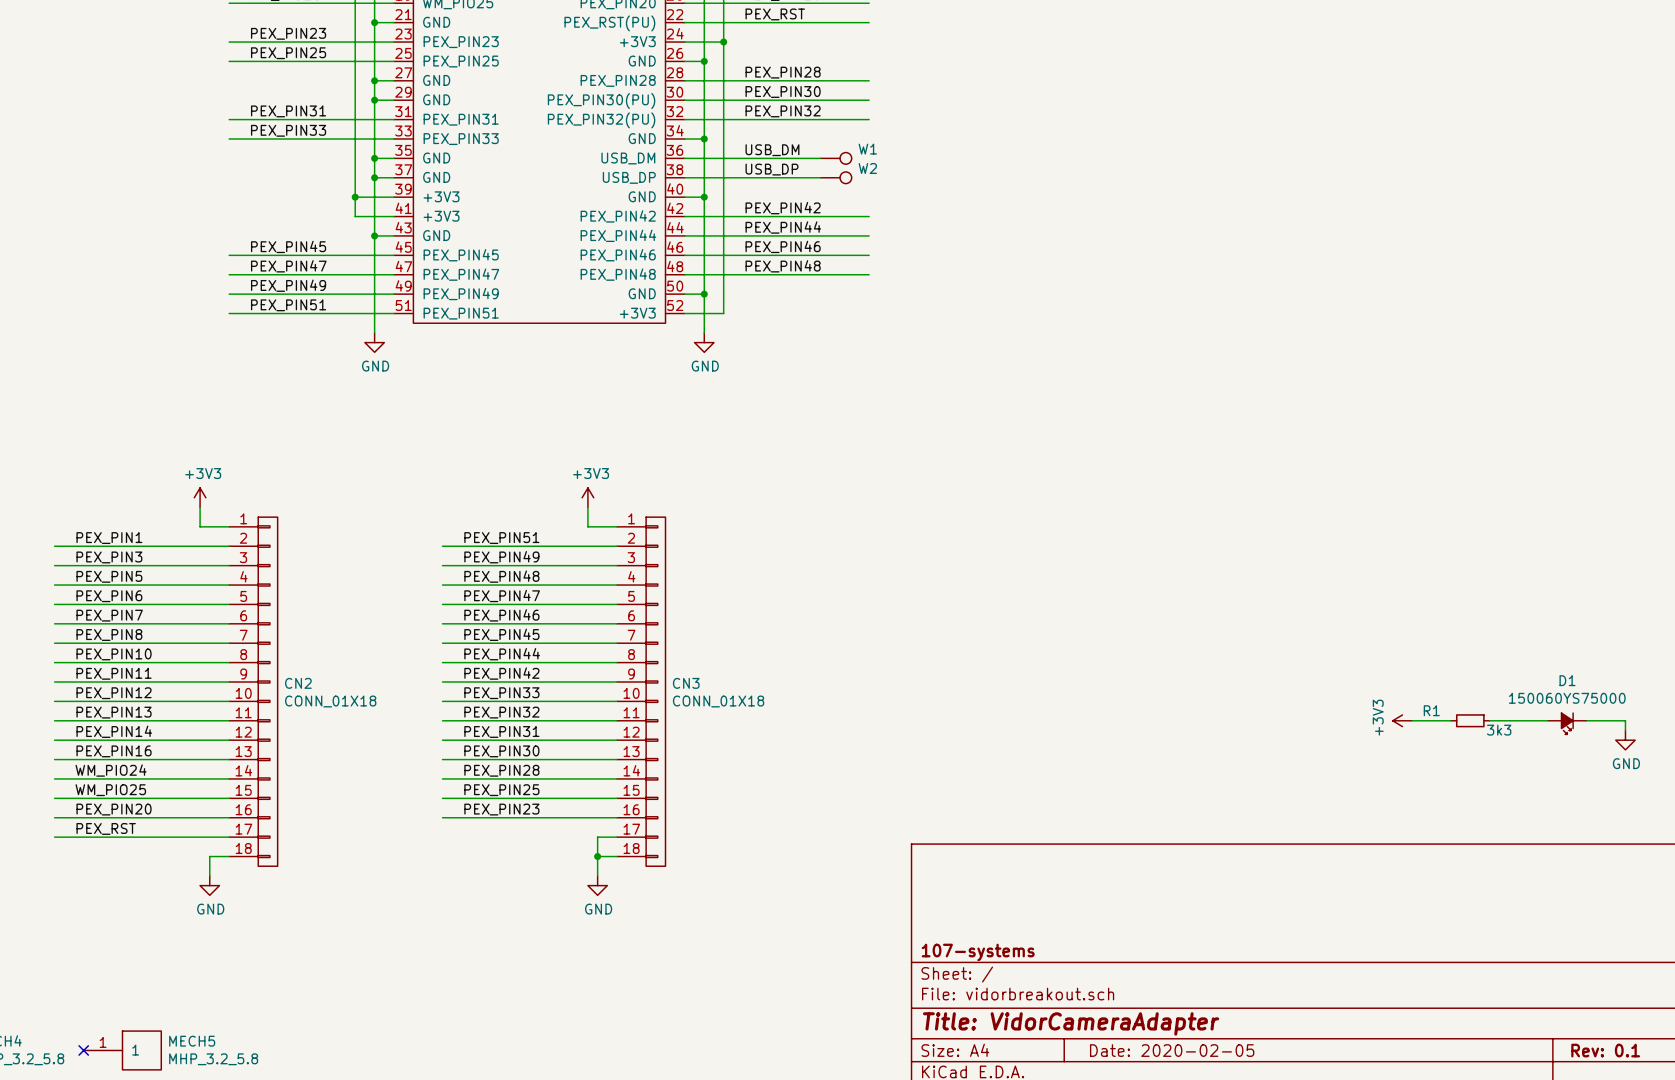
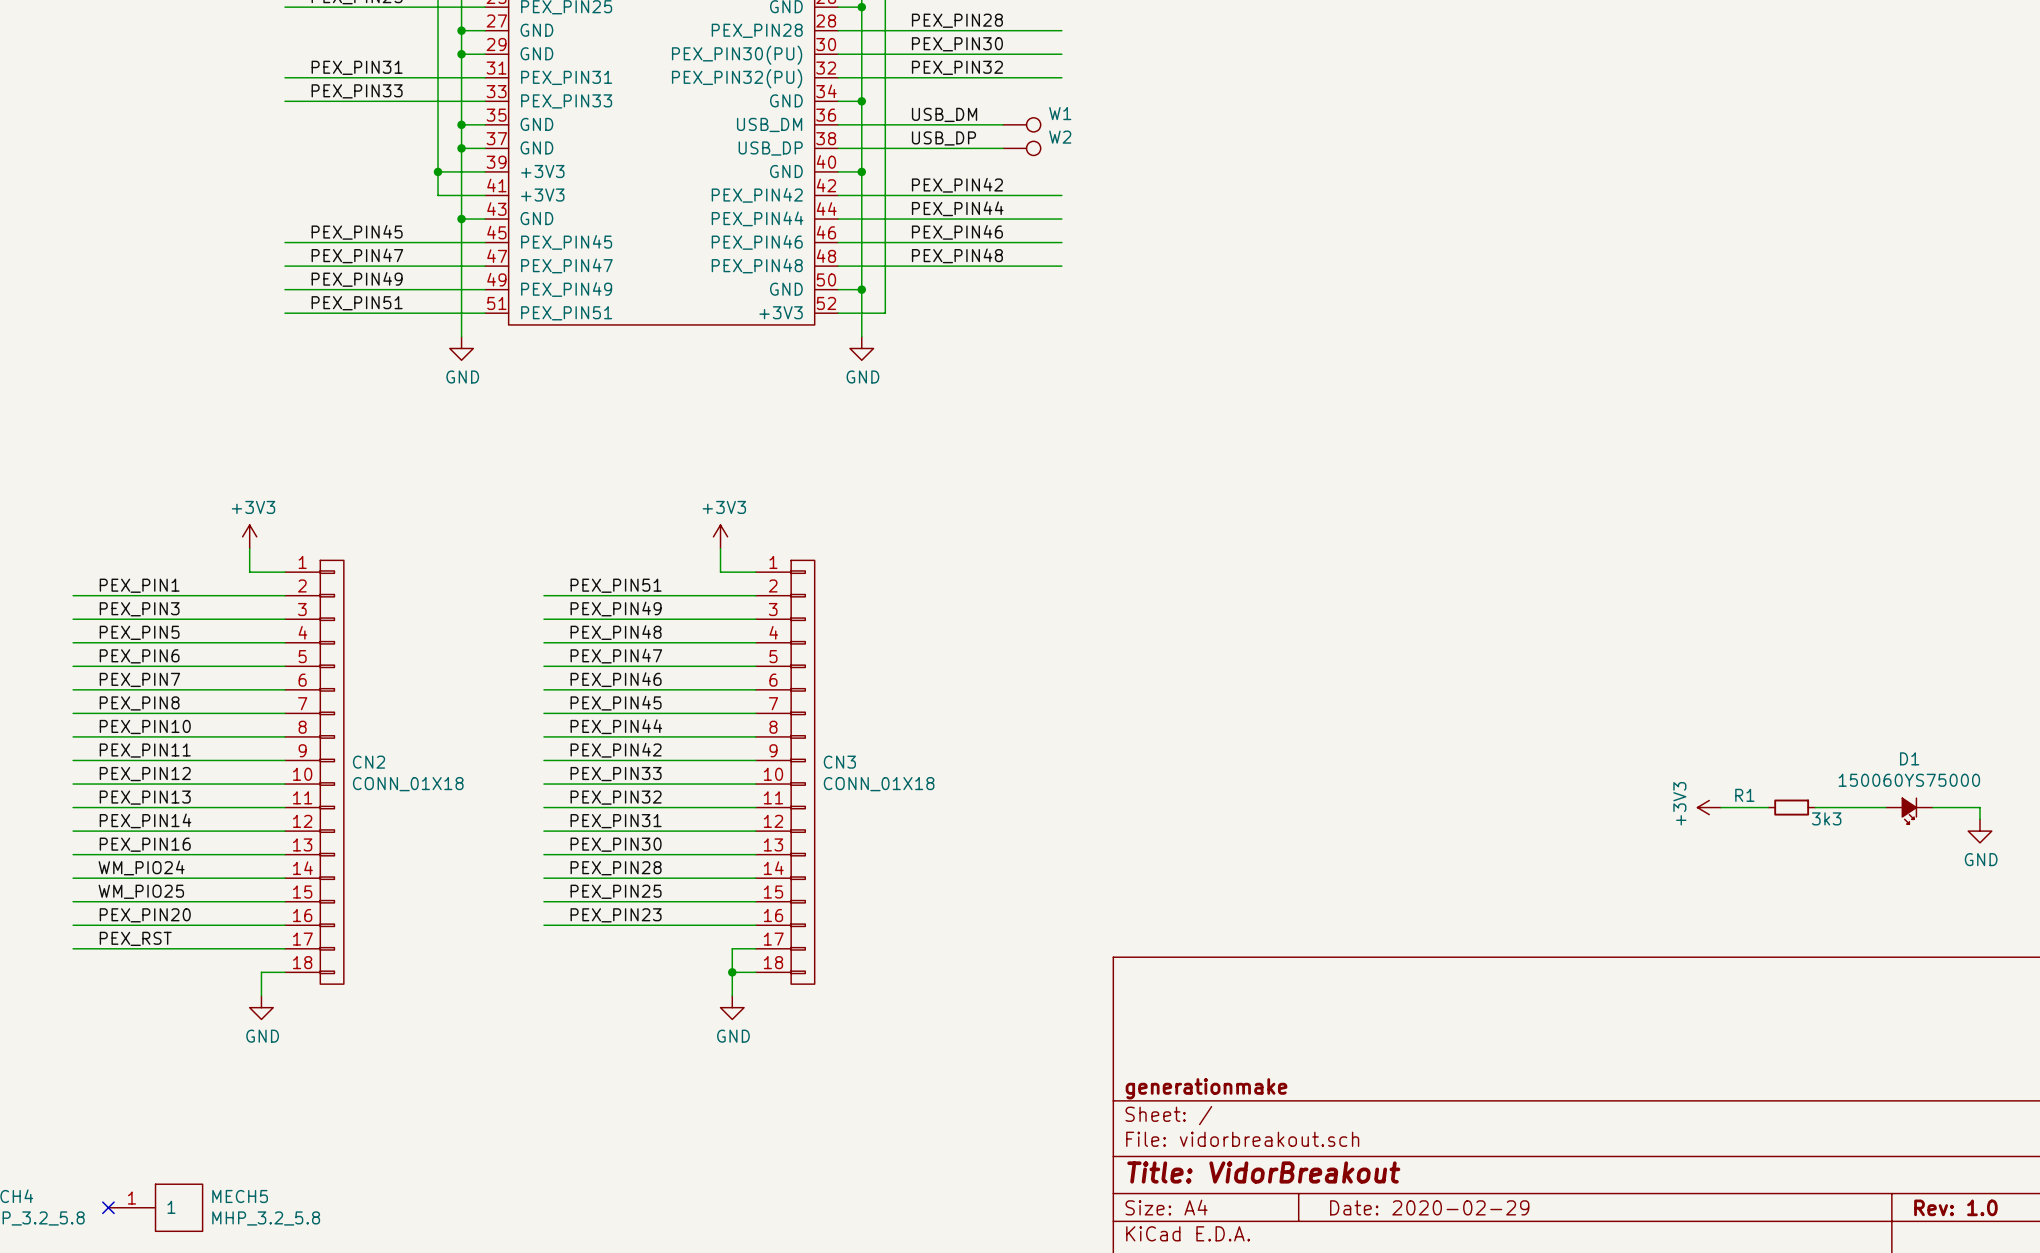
title block: 107-systems (978, 952) -> generationmake (1206, 1088)
title block: Title: VidorCameraAdapter (1071, 1023) -> Title: VidorBreakout (1263, 1172)
title block: Date: 2020-02-05 (1172, 1050) -> Date: 2020-02-29 (1429, 1207)
title block: Rev: 0.1 (1605, 1050) -> Rev: 1.0 (1955, 1207)

